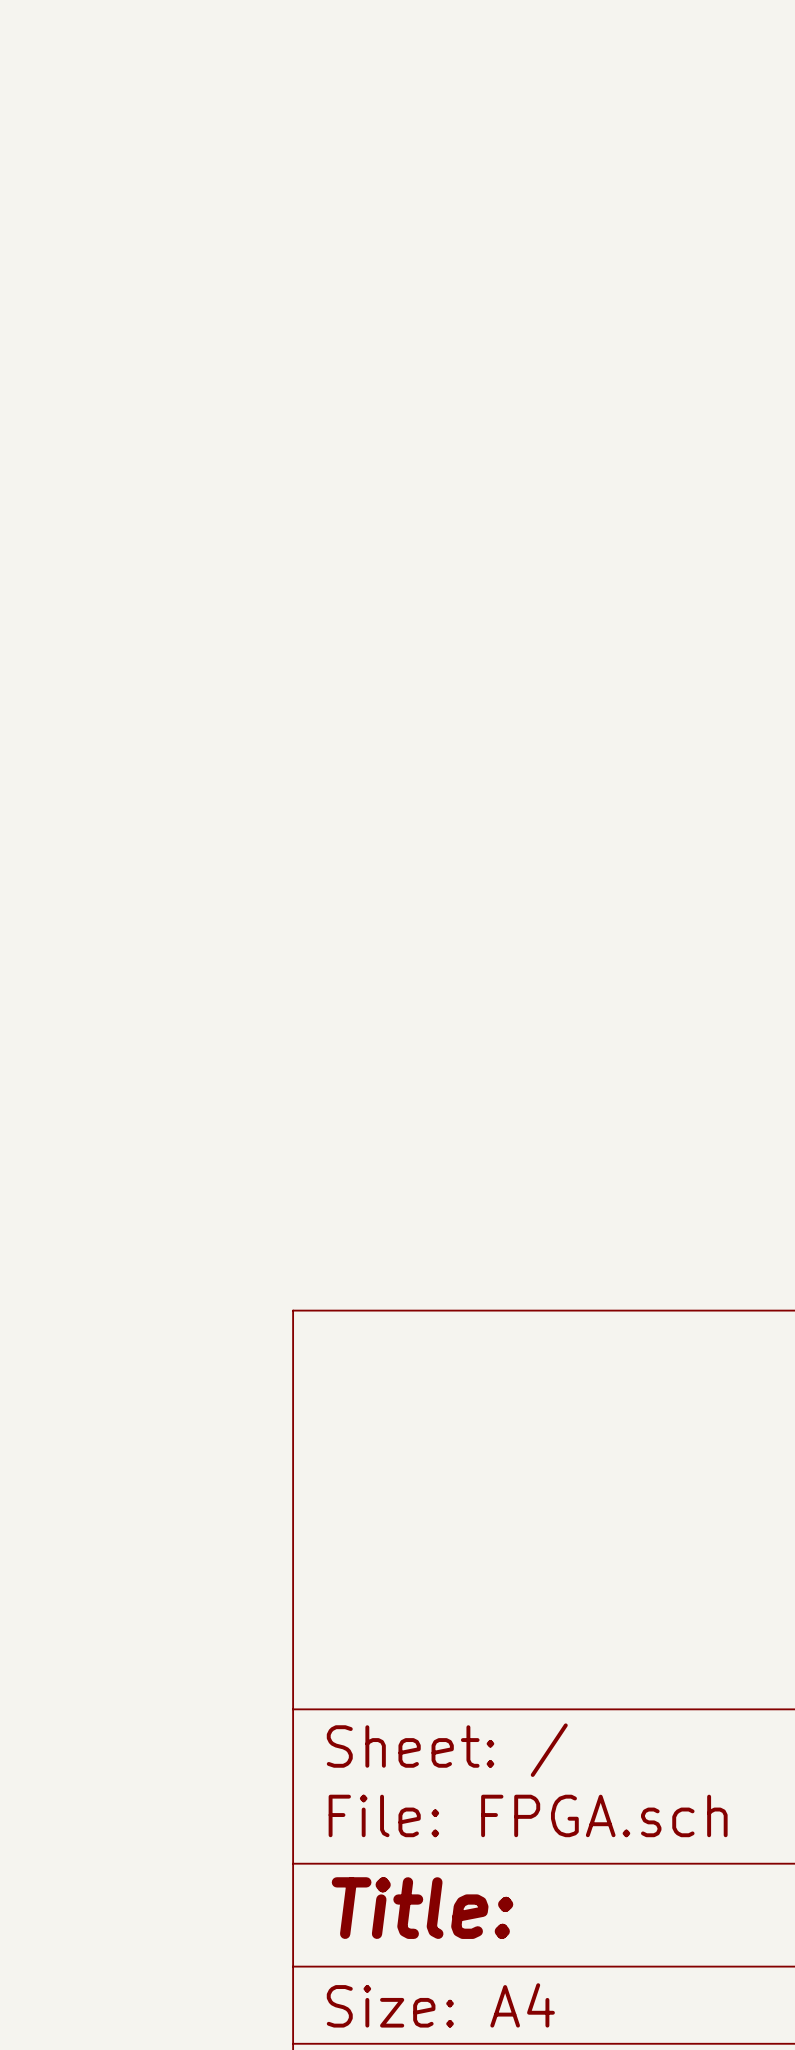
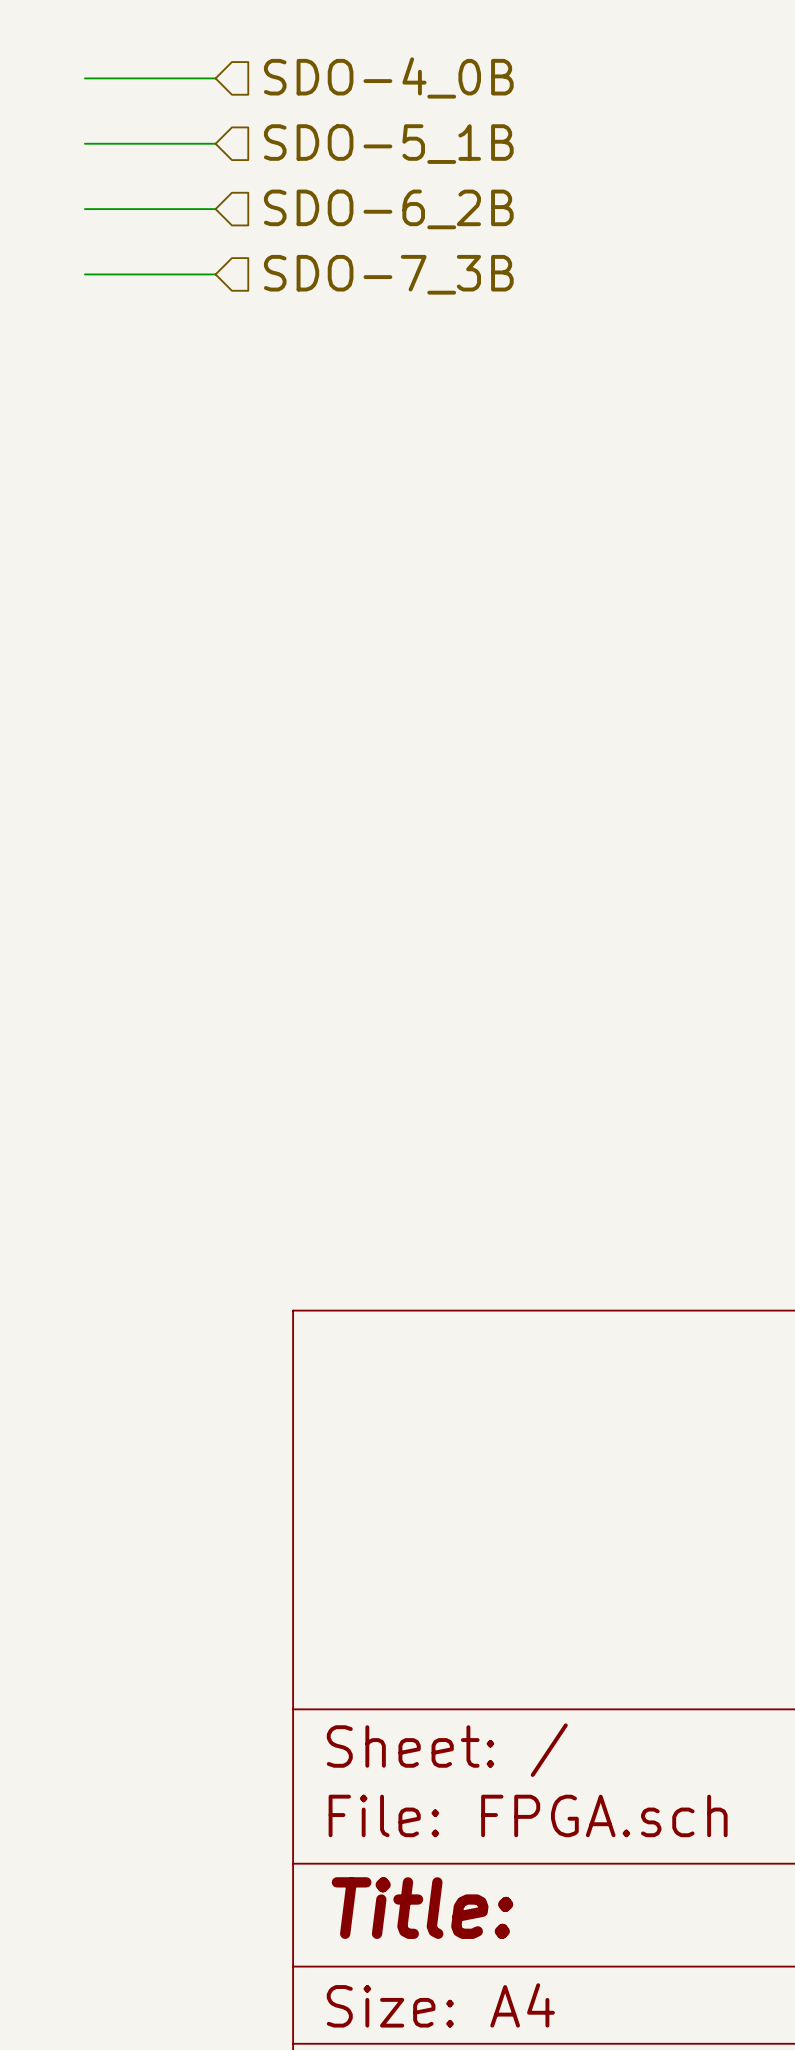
hierarchical label: none -> SDO-4_0B (388, 77)
wire: none -> (84, 78) (215, 78)
wire: none -> (84, 143) (215, 143)
hierarchical label: none -> SDO-5_1B (388, 144)
wire: none -> (84, 209) (215, 209)
hierarchical label: none -> SDO-6_2B (388, 209)
wire: none -> (84, 274) (215, 274)
hierarchical label: none -> SDO-7_3B (388, 274)

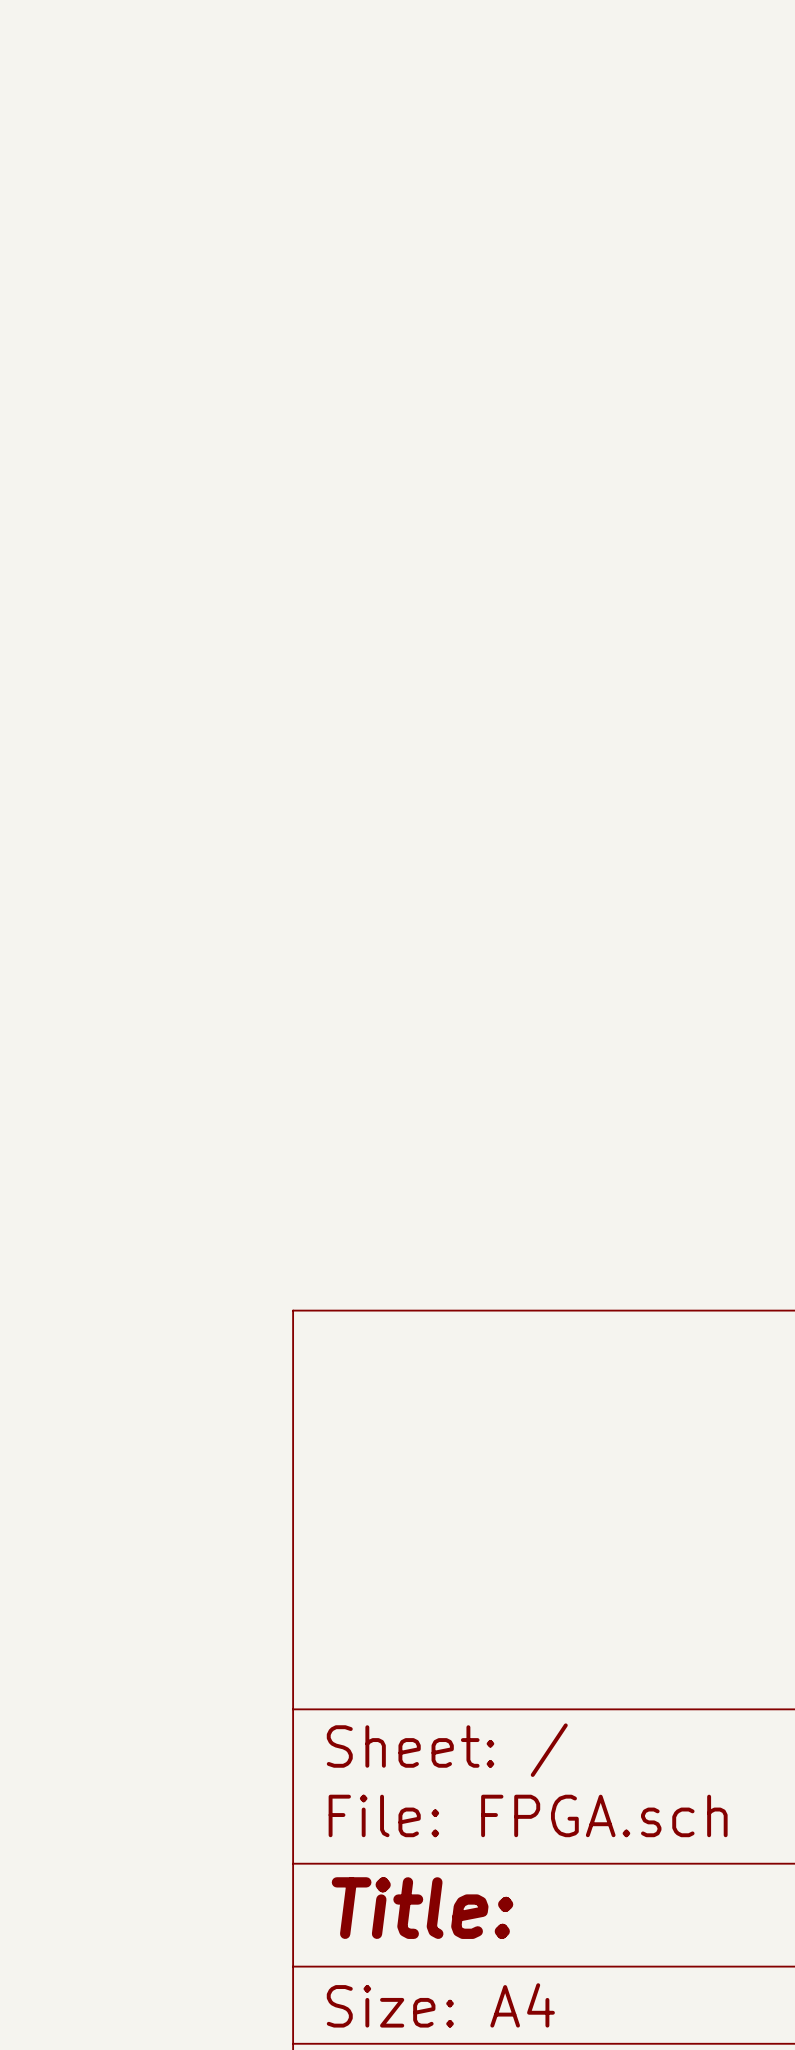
hierarchical label: SDO-4_0B (388, 77) -> none
wire: (84, 78) (215, 78) -> none
wire: (84, 143) (215, 143) -> none
hierarchical label: SDO-5_1B (388, 144) -> none
wire: (84, 209) (215, 209) -> none
hierarchical label: SDO-6_2B (388, 209) -> none
wire: (84, 274) (215, 274) -> none
hierarchical label: SDO-7_3B (388, 274) -> none

